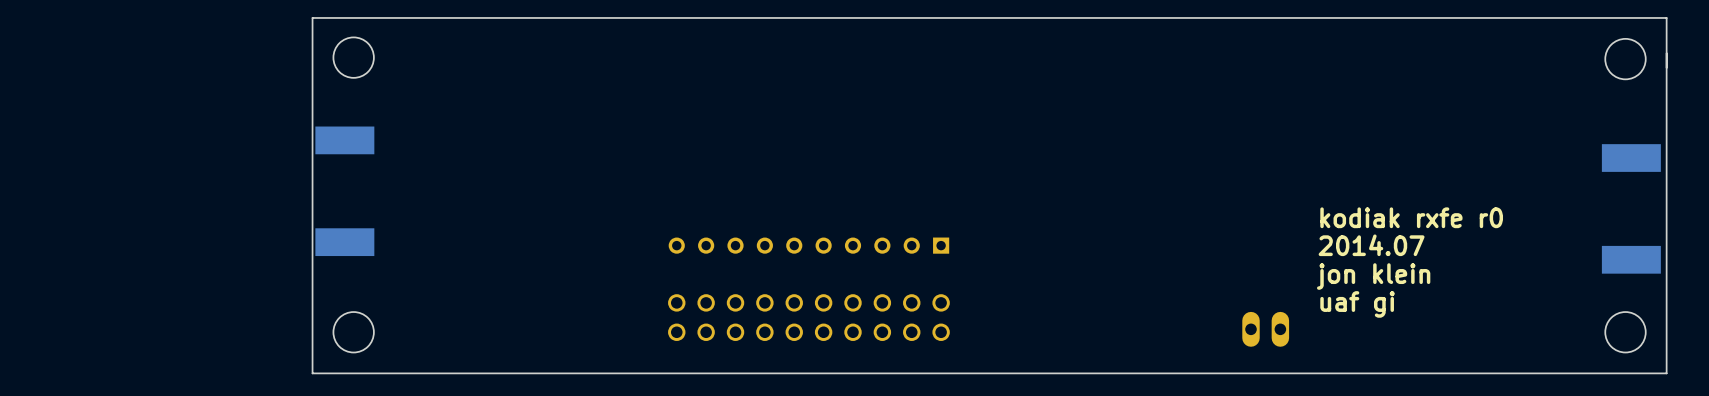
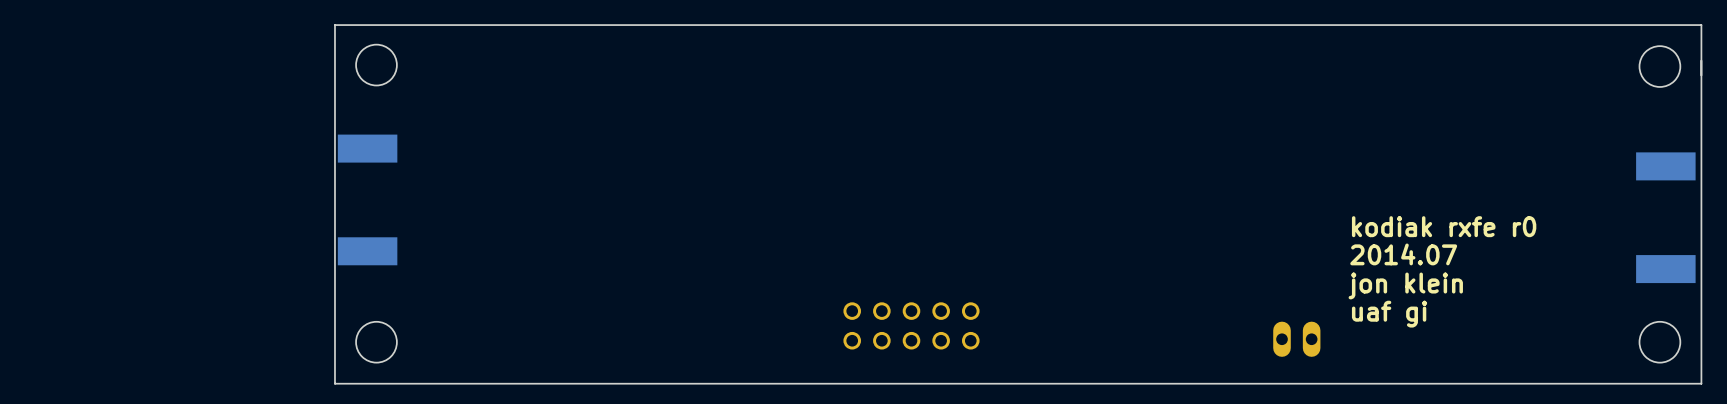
part: (808, 245) -> none
part: none -> (911, 325)
part: (808, 317) -> none

